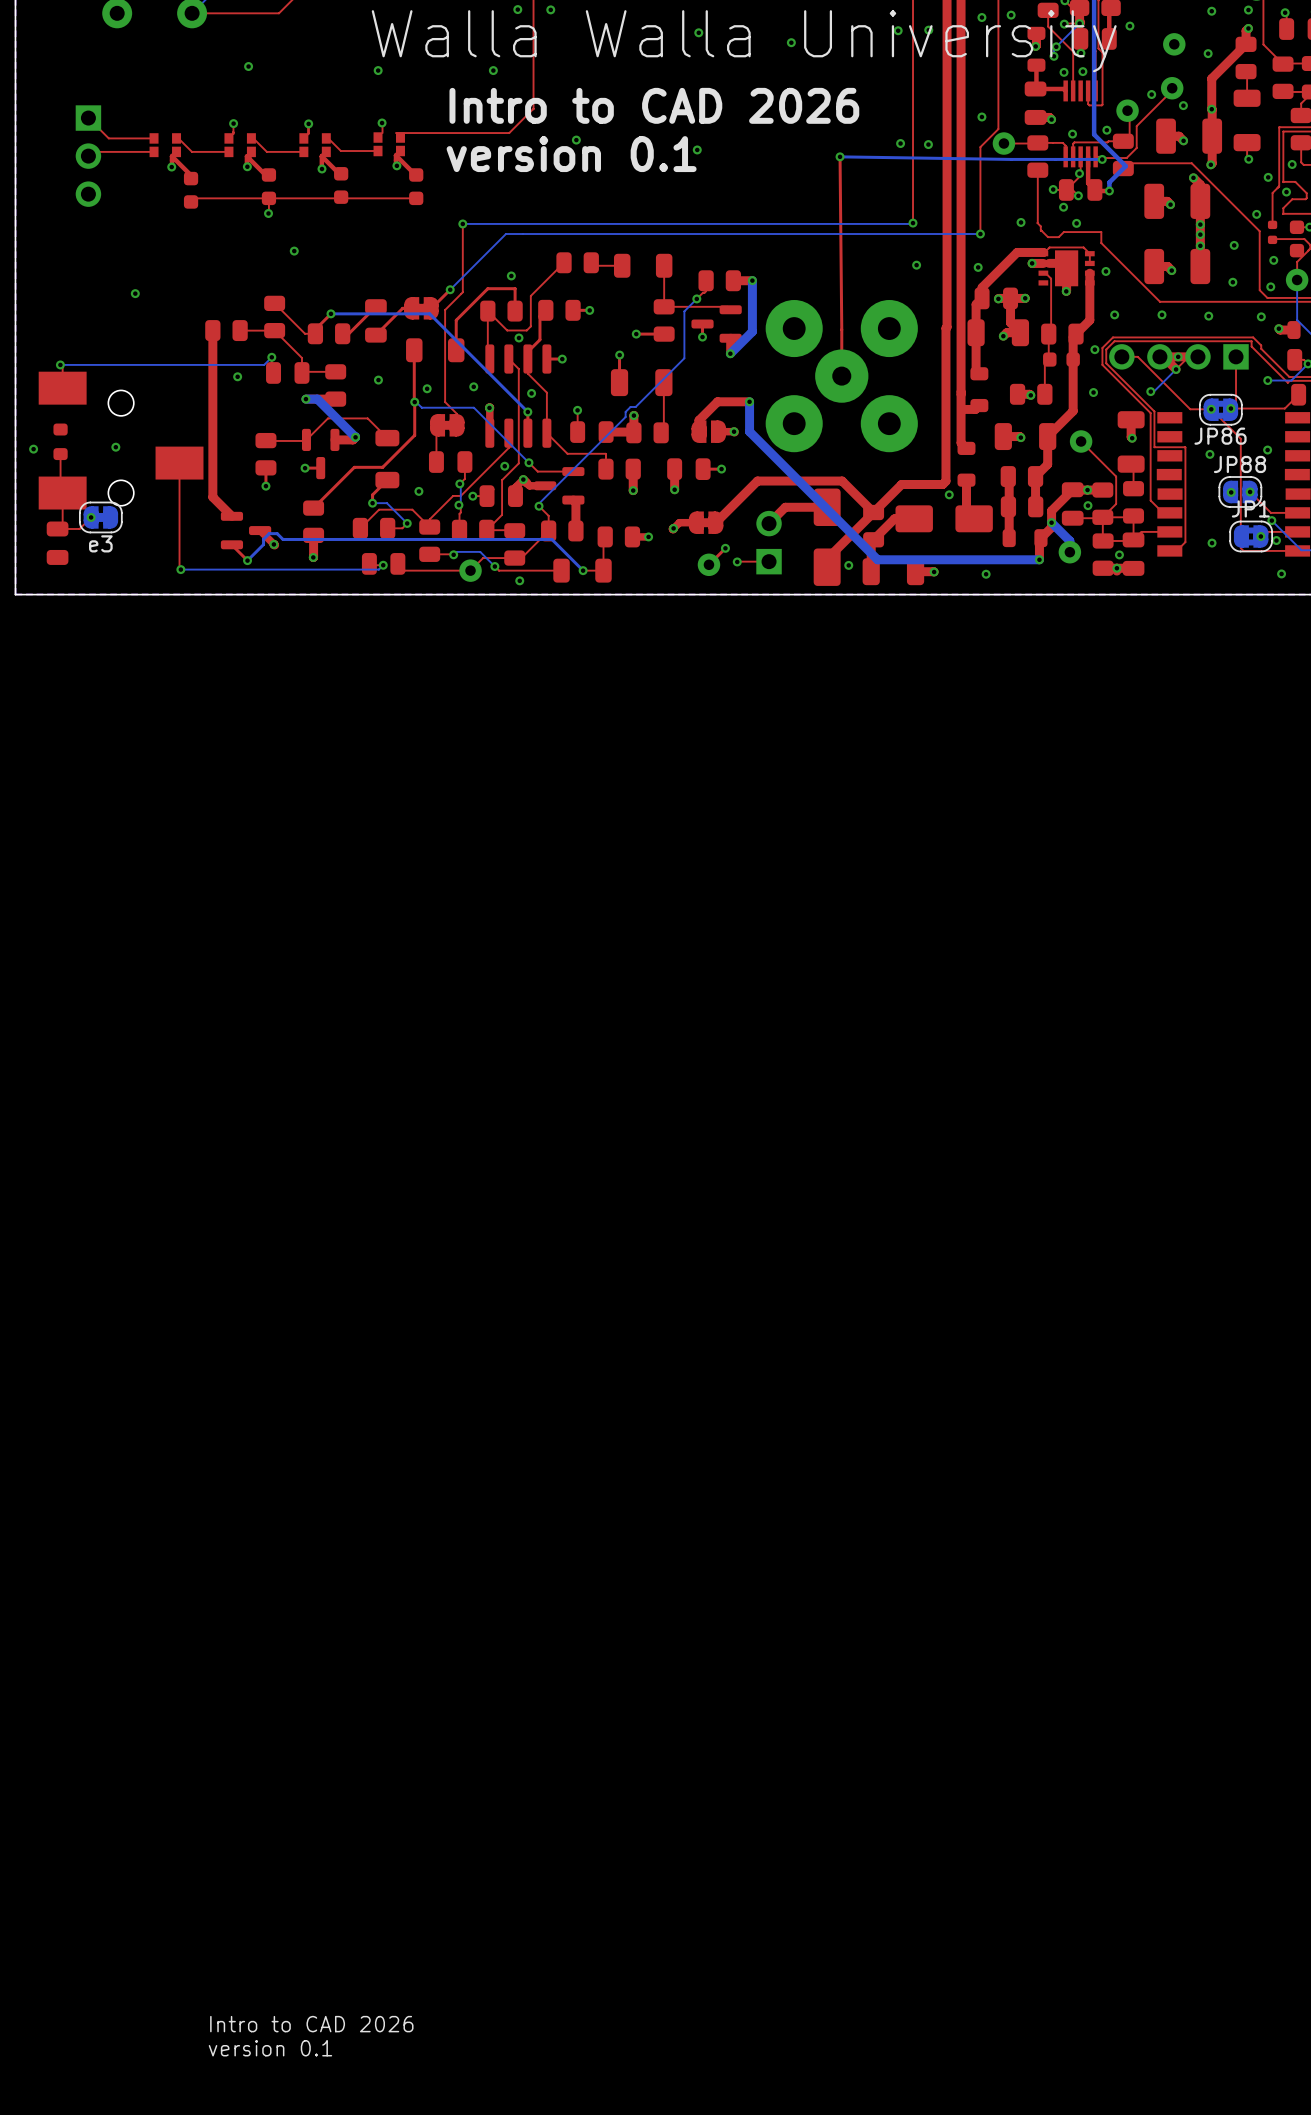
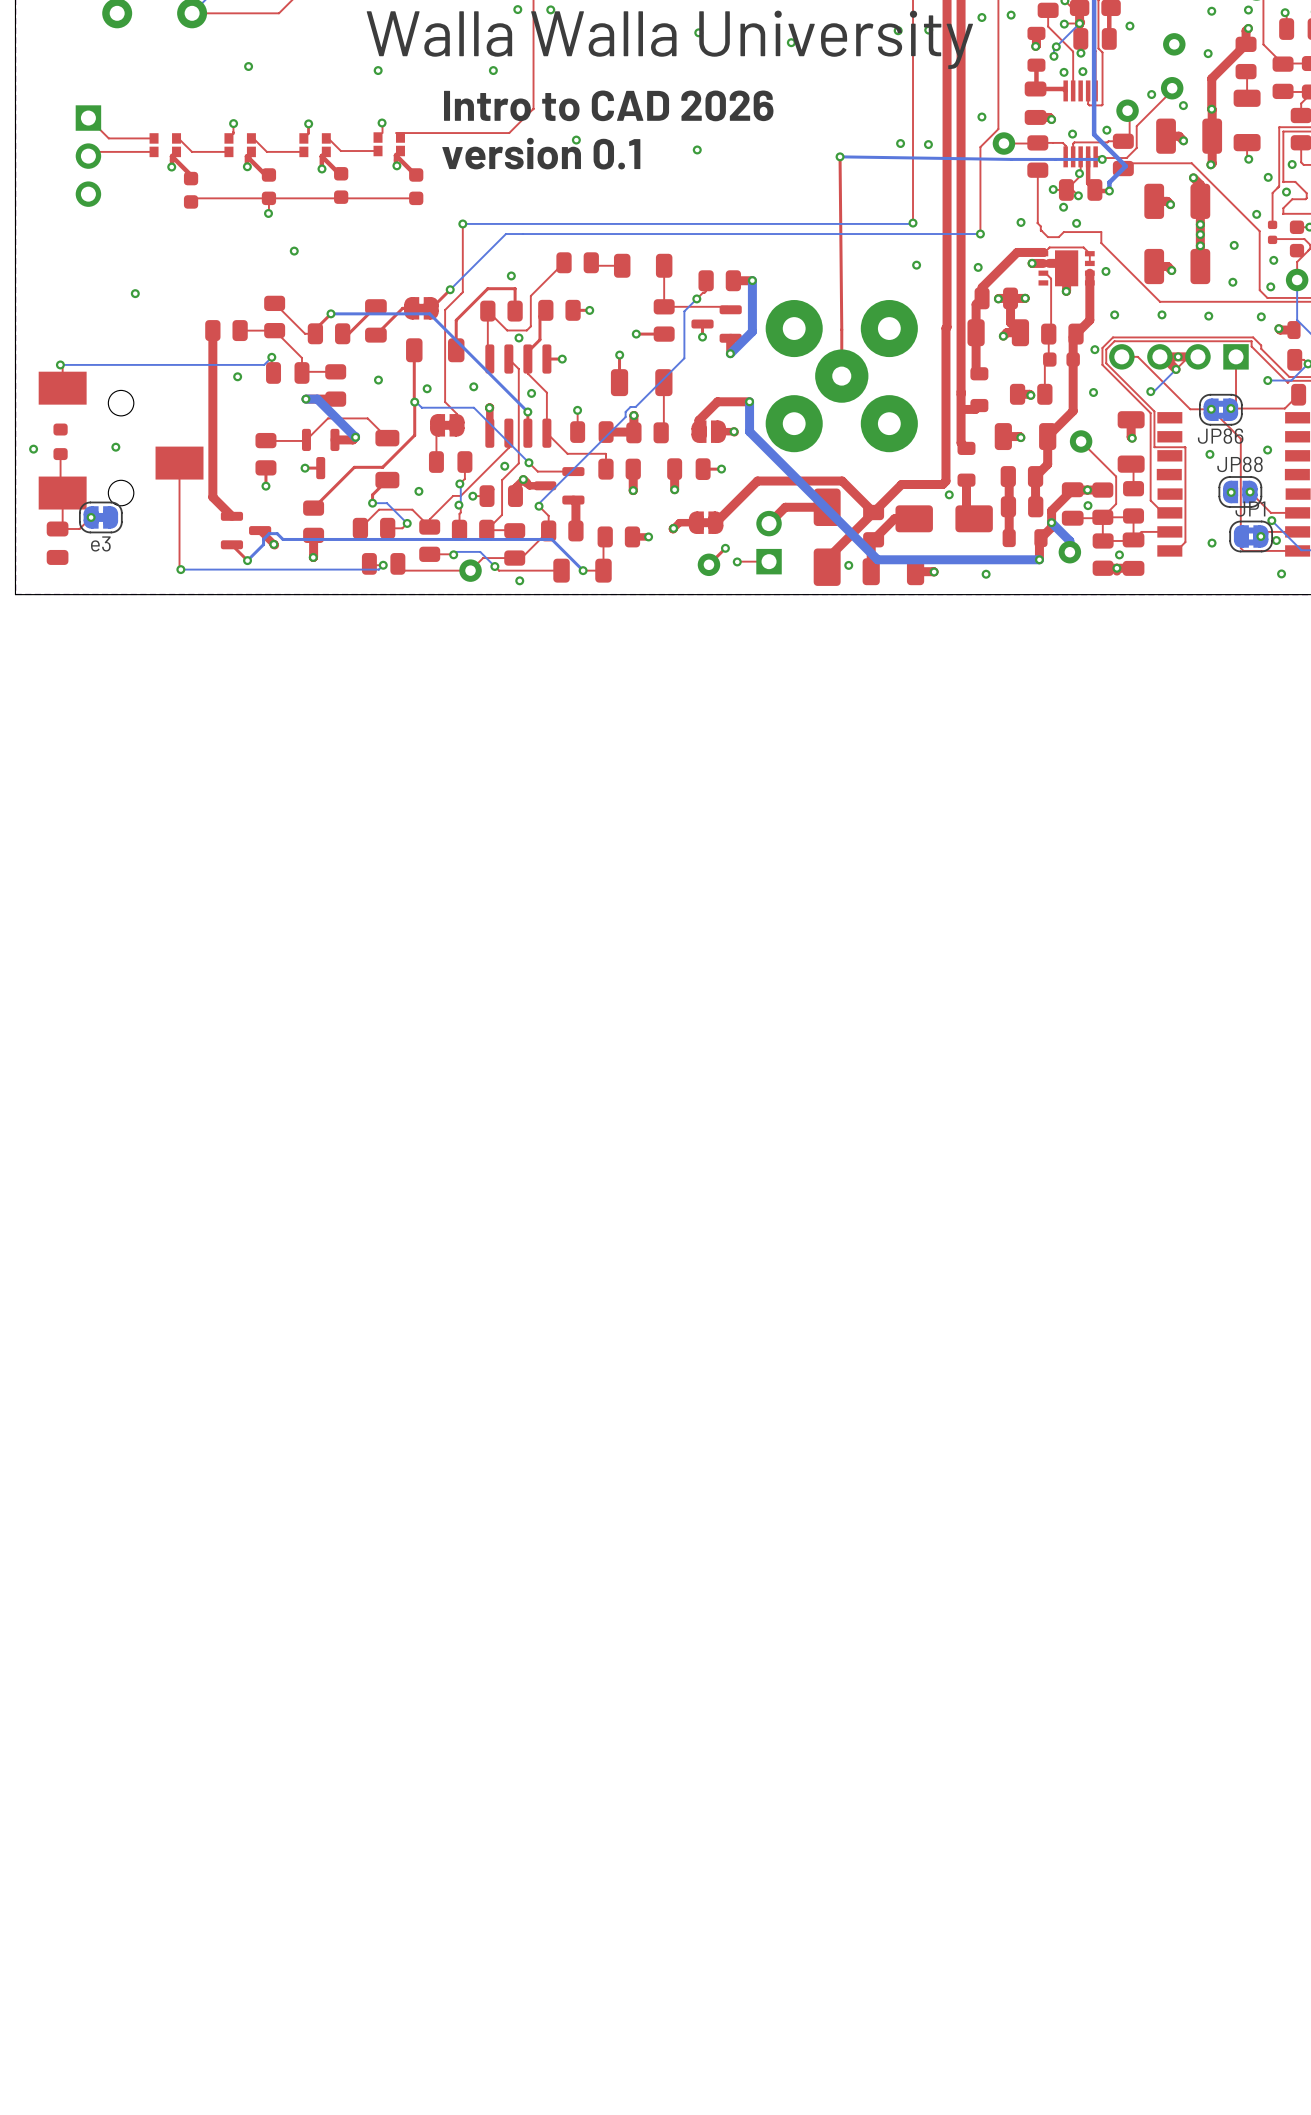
text: Intro to CAD 2026 (311, 2024) -> none
text: version 0.1 (270, 2048) -> none

